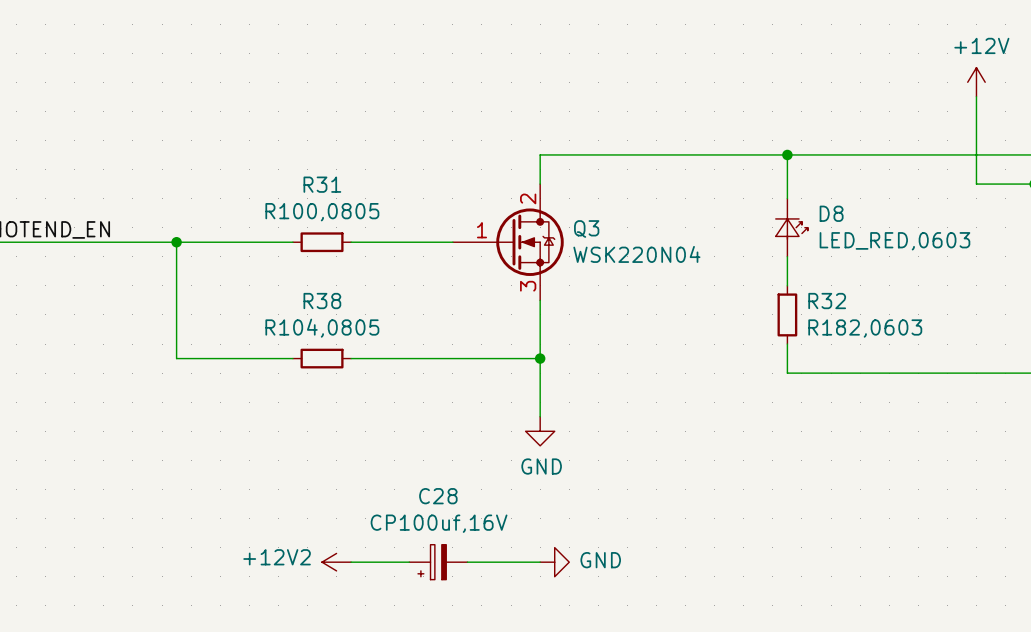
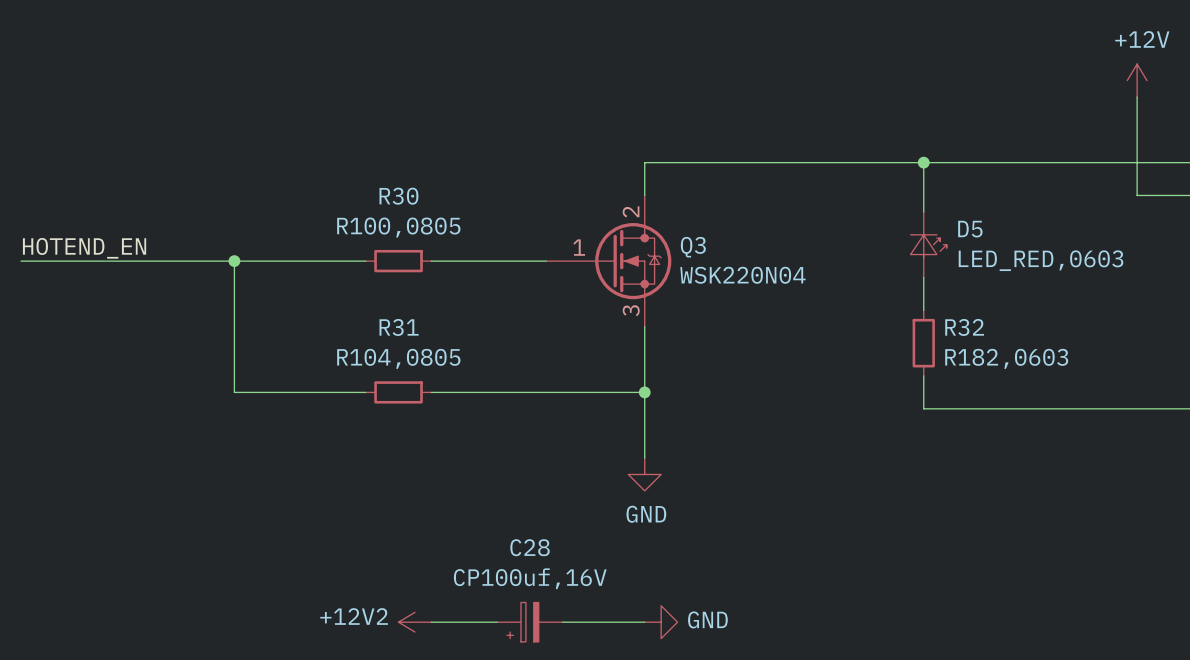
R31 name: R31 (322, 184) -> R30 (398, 196)
D8 name: D8 (831, 213) -> D5 (970, 229)
R38 name: R38 (322, 301) -> R31 (399, 327)

